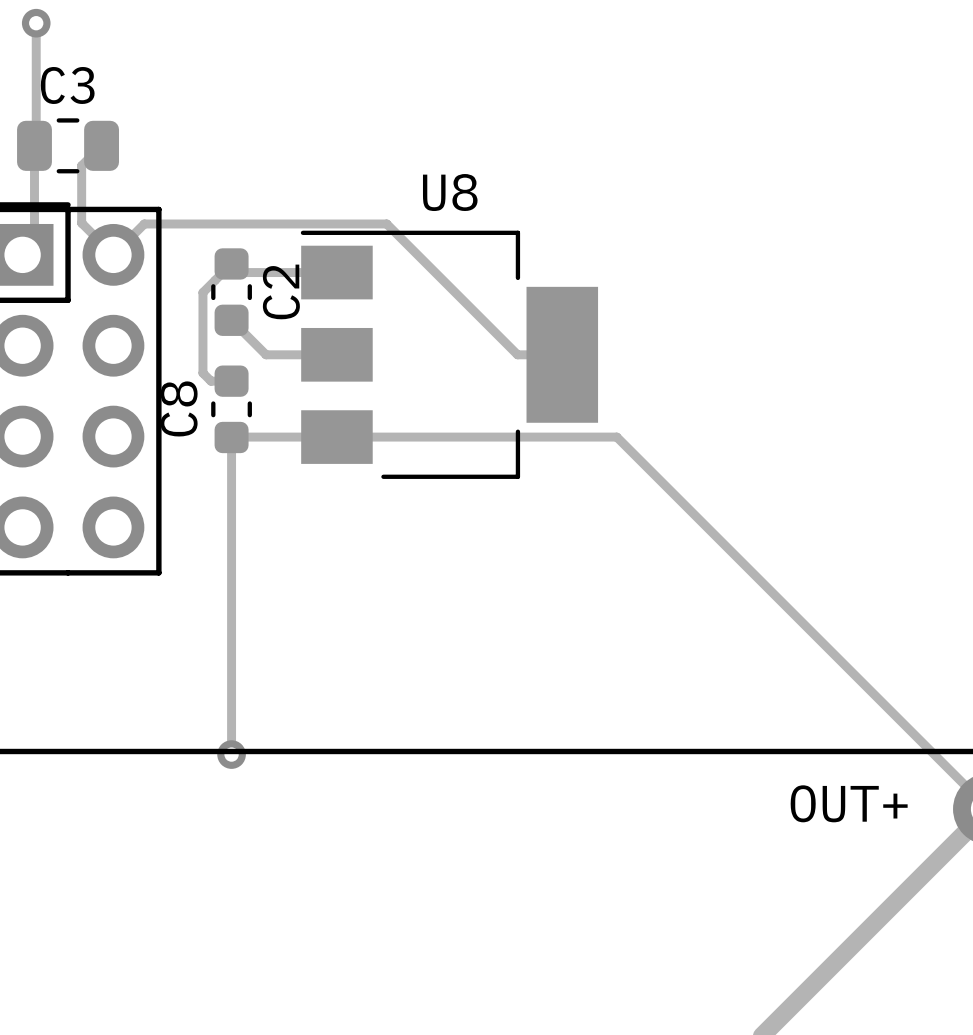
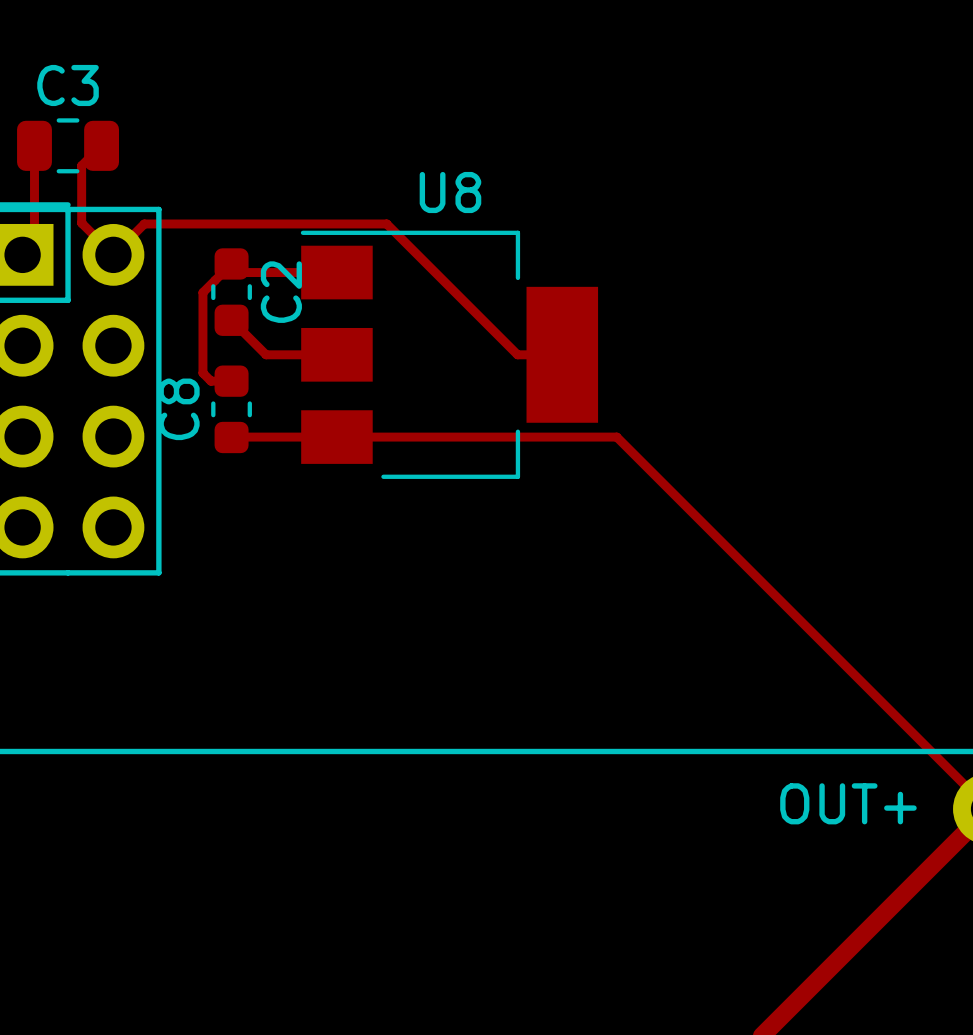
track: (36, 23) (36, 144) (34, 145) -> none
via: (36, 23) -> none
track: (231, 437) (231, 754) -> none
via: (231, 754) -> none

